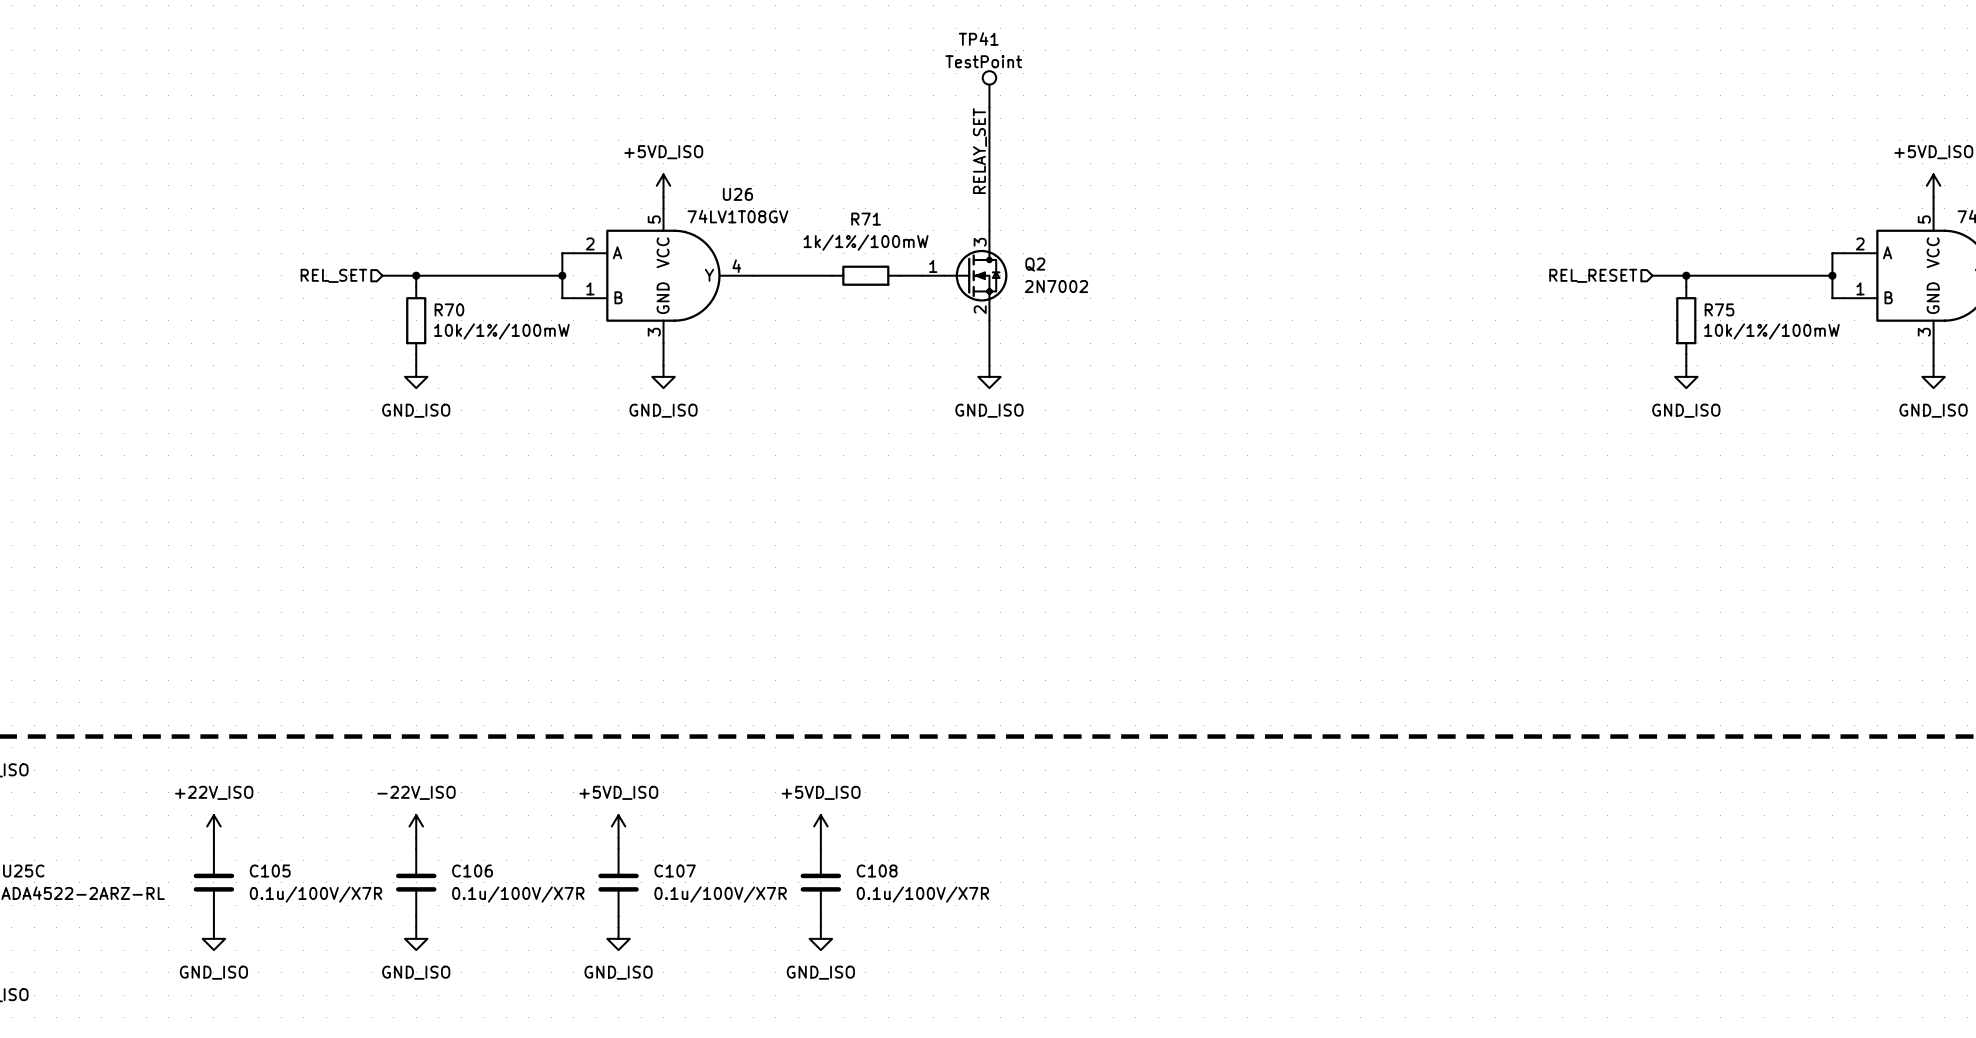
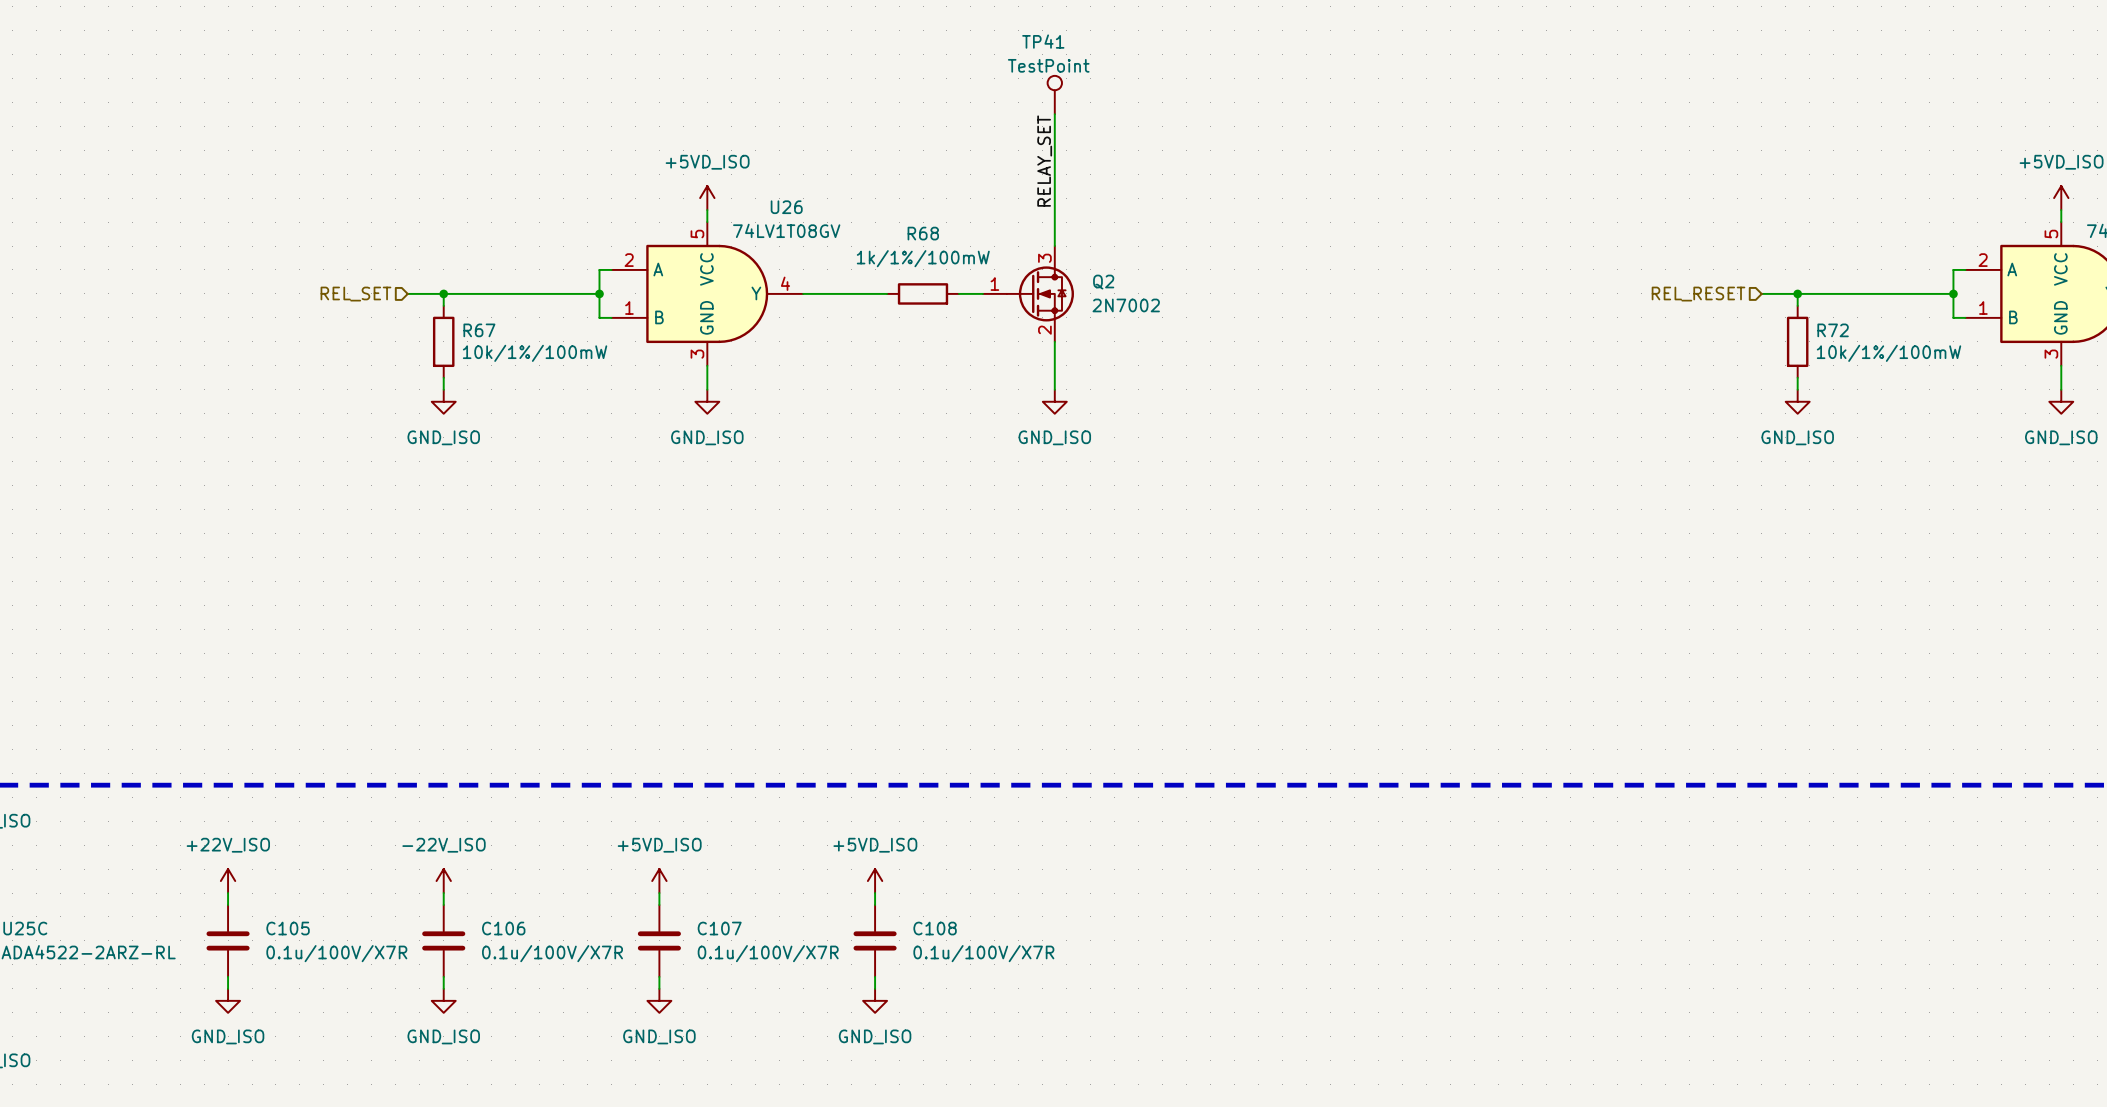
R71 name: R71 (866, 219) -> R68 (923, 233)
R70 name: R70 (449, 309) -> R67 (479, 330)
R75 name: R75 (1719, 309) -> R72 (1833, 330)

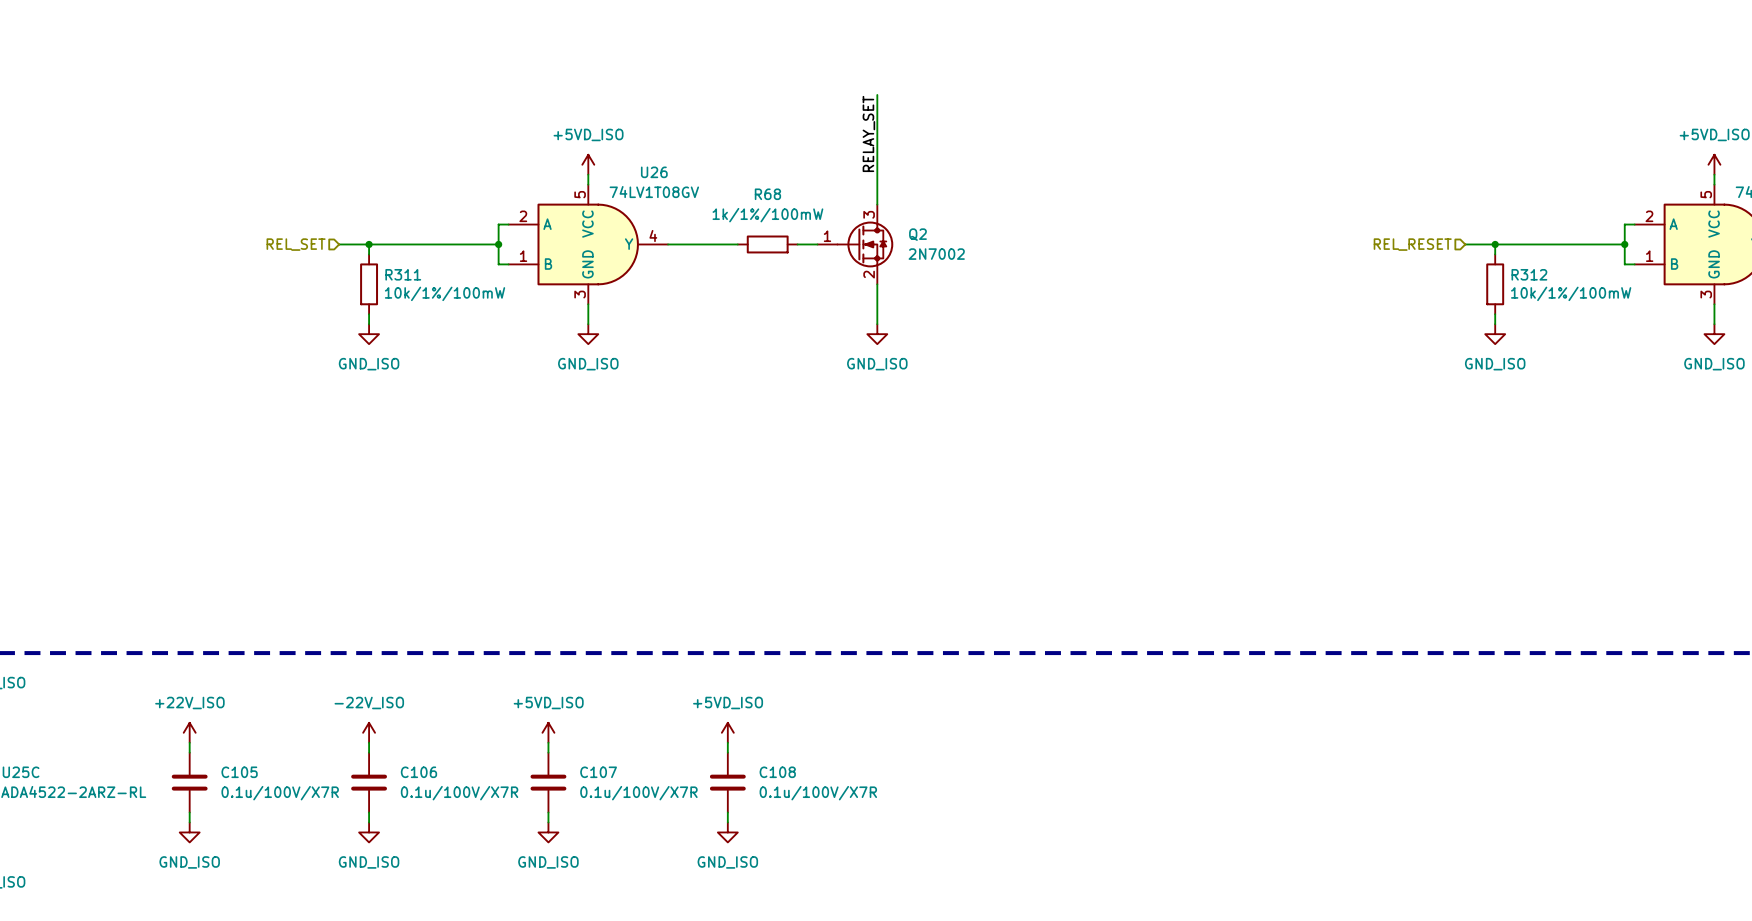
TP41: TestPoint (1054, 95) -> none
R67 name: R67 (479, 330) -> R311 (403, 274)
R72 name: R72 (1833, 330) -> R312 (1529, 274)

